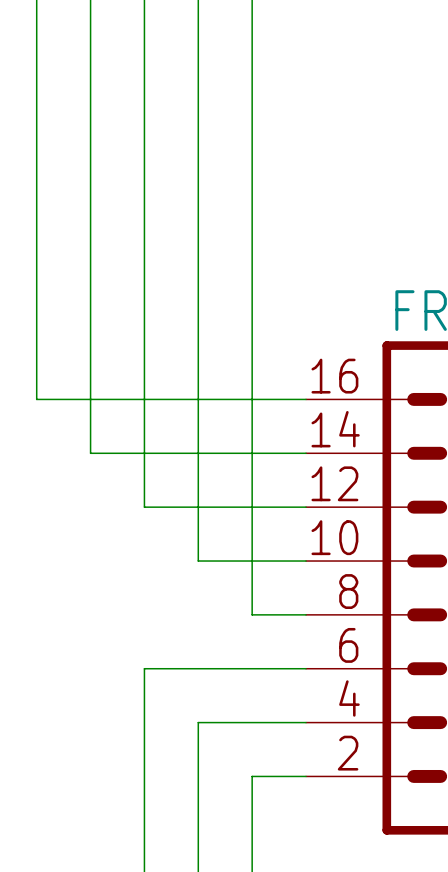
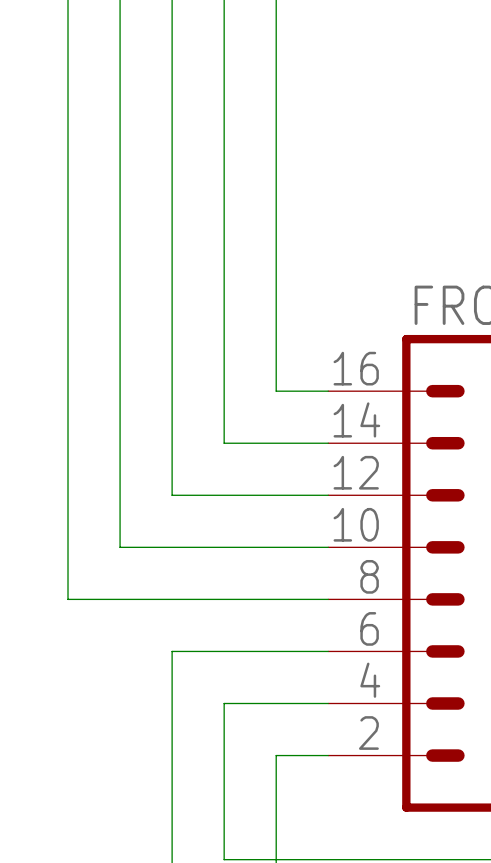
wire: (36, 399) (252, 399) (252, 614) -> (68, 391) (68, 599) (276, 599)
wire: (90, 453) (198, 453) (198, 561) -> (120, 443) (120, 547) (224, 547)

